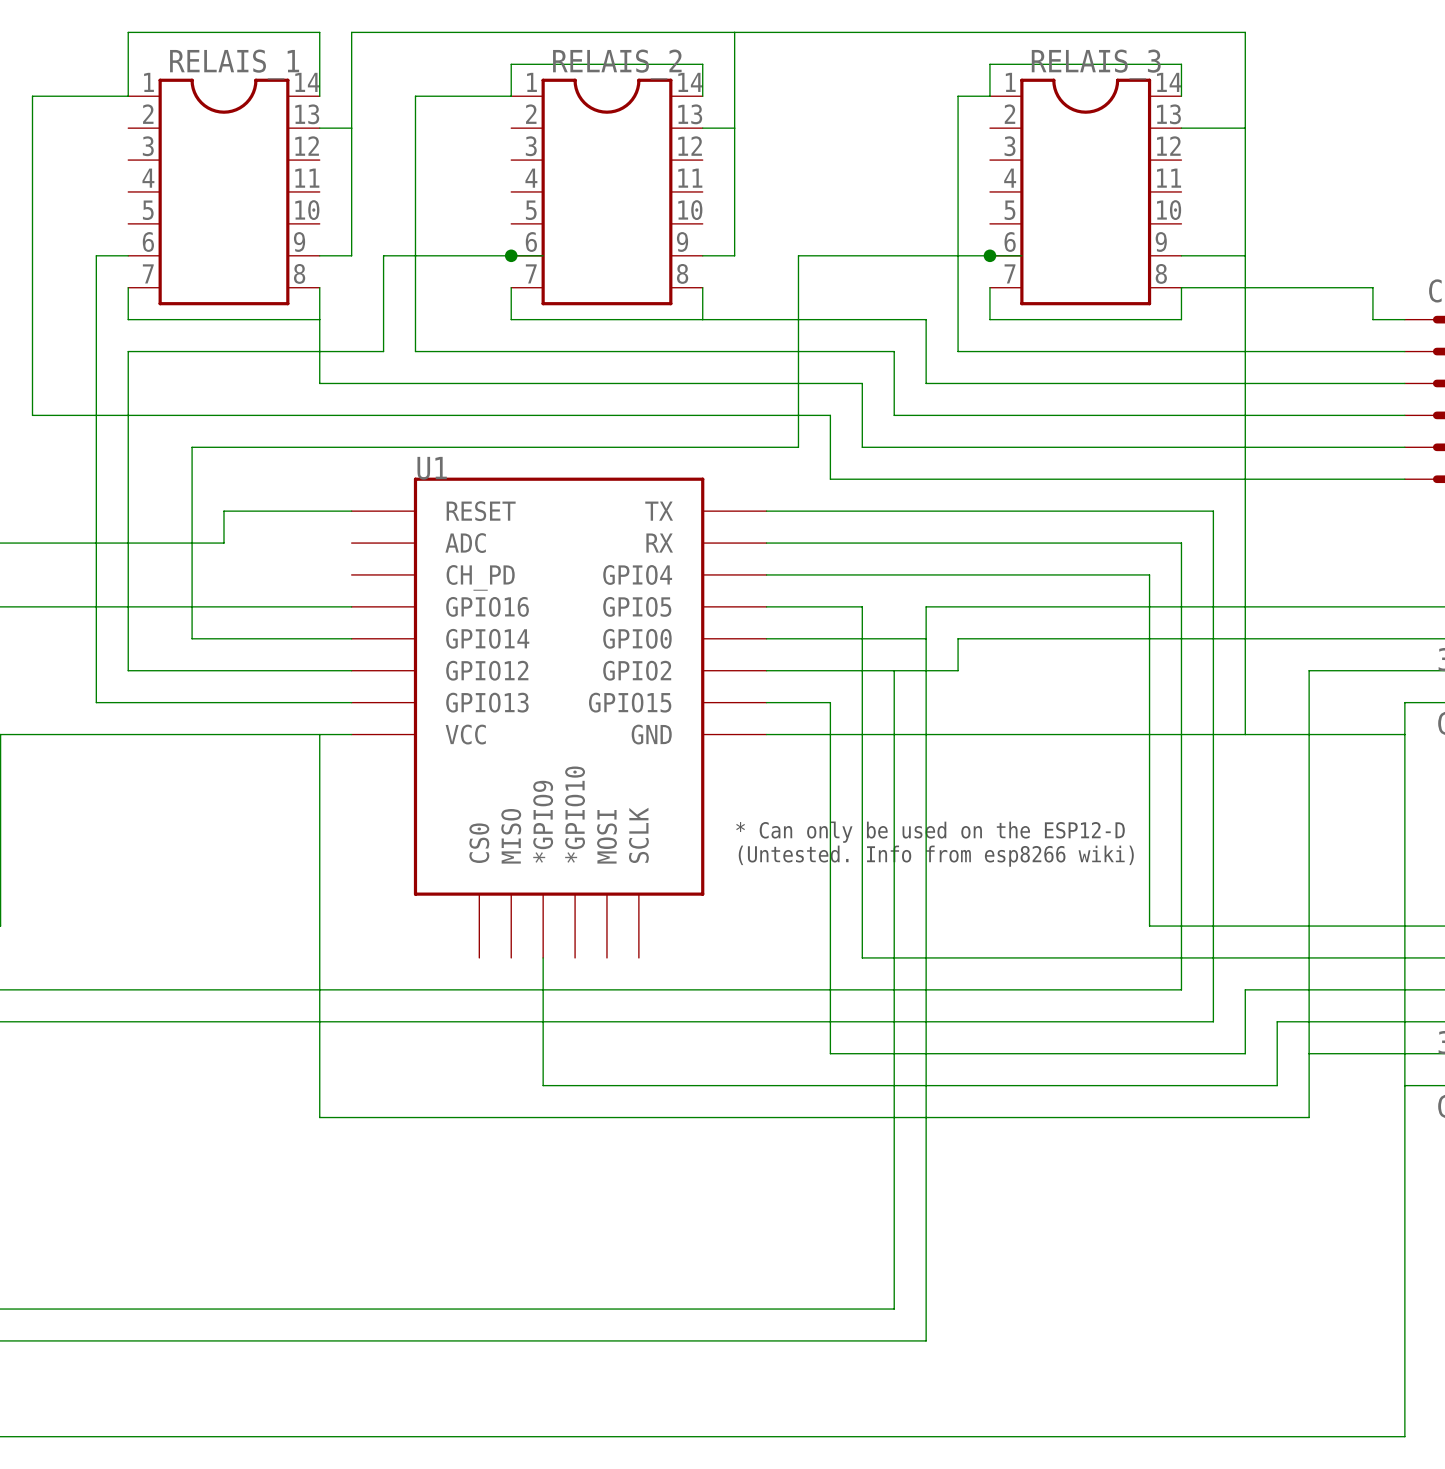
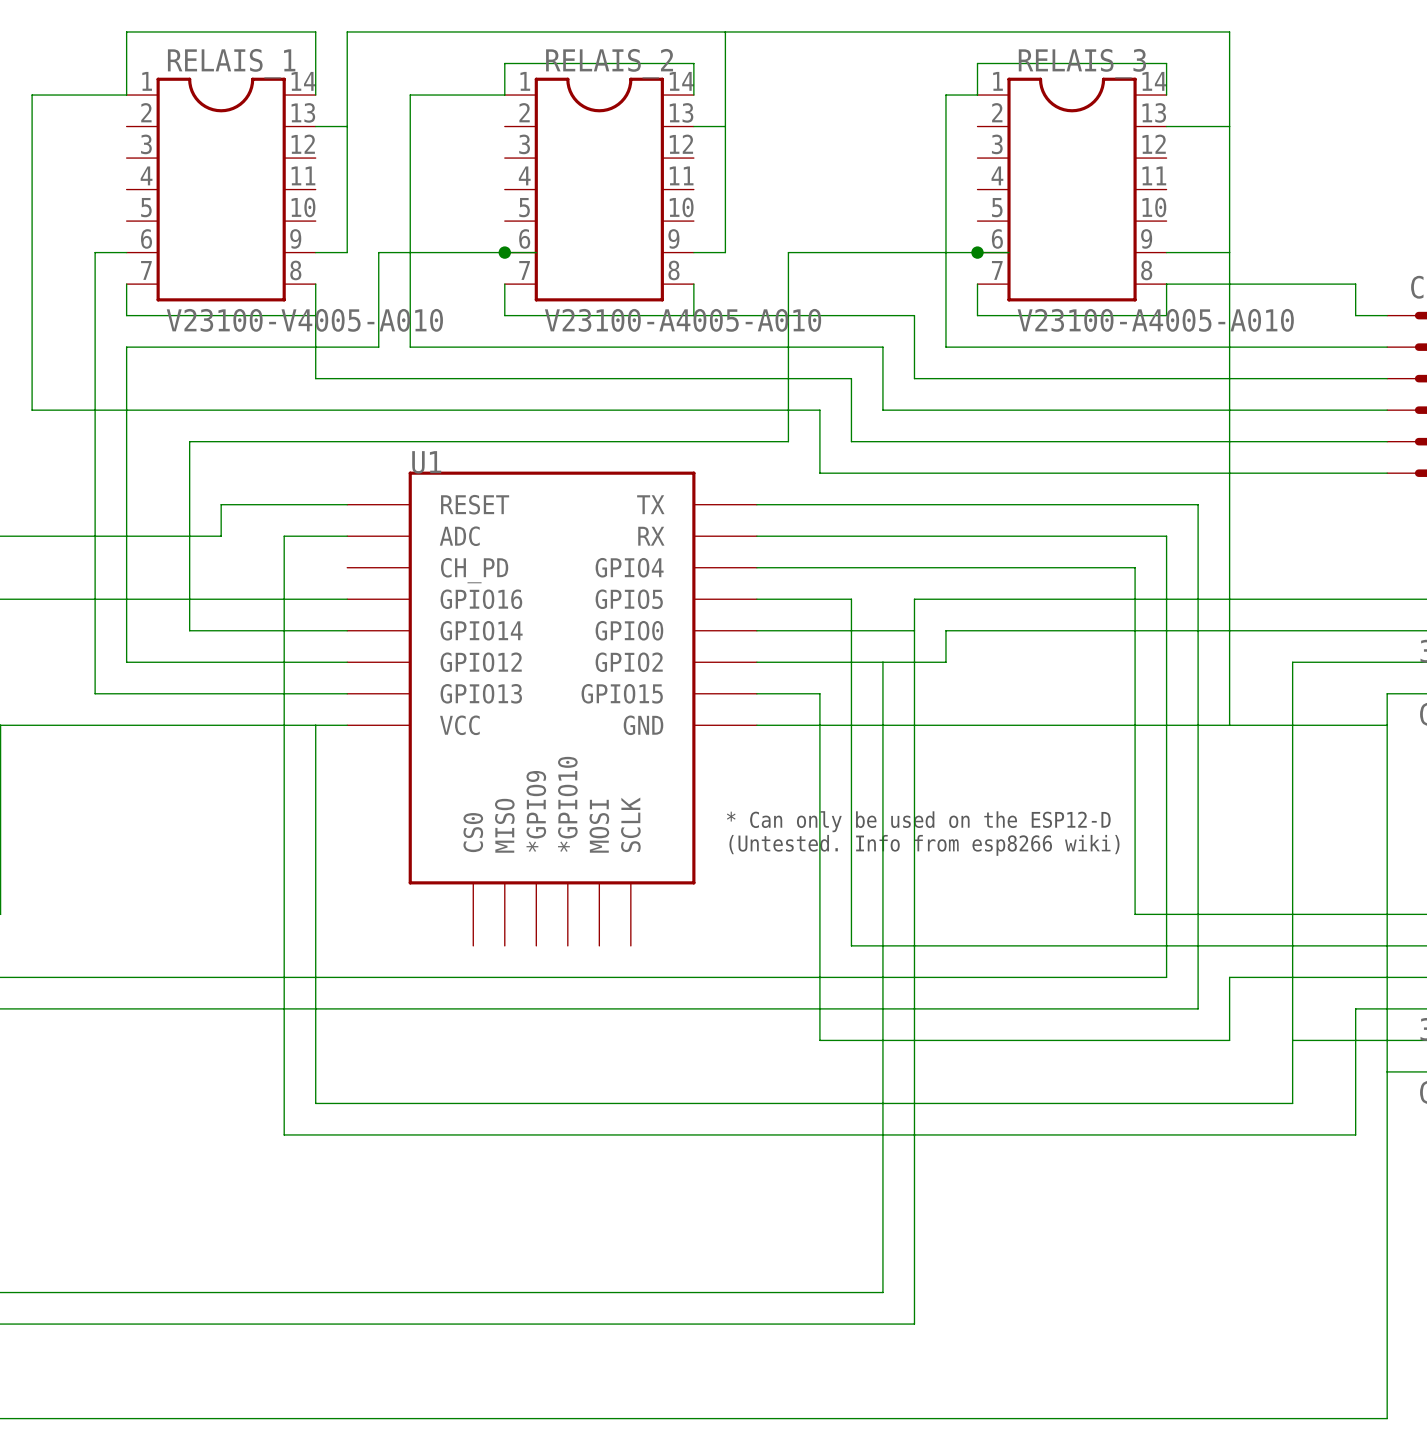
RELAIS_1 value: none -> V23100-V4005-A010 (304, 320)
RELAIS_2 value: none -> V23100-A4005-A010 (683, 320)
RELAIS_3 value: none -> V23100-A4005-A010 (1155, 320)
wire: (543, 957) (543, 1085) (1277, 1085) (1277, 1021) (1372, 1021) -> (347, 536) (284, 536) (284, 1134) (1355, 1134) (1355, 1008)

